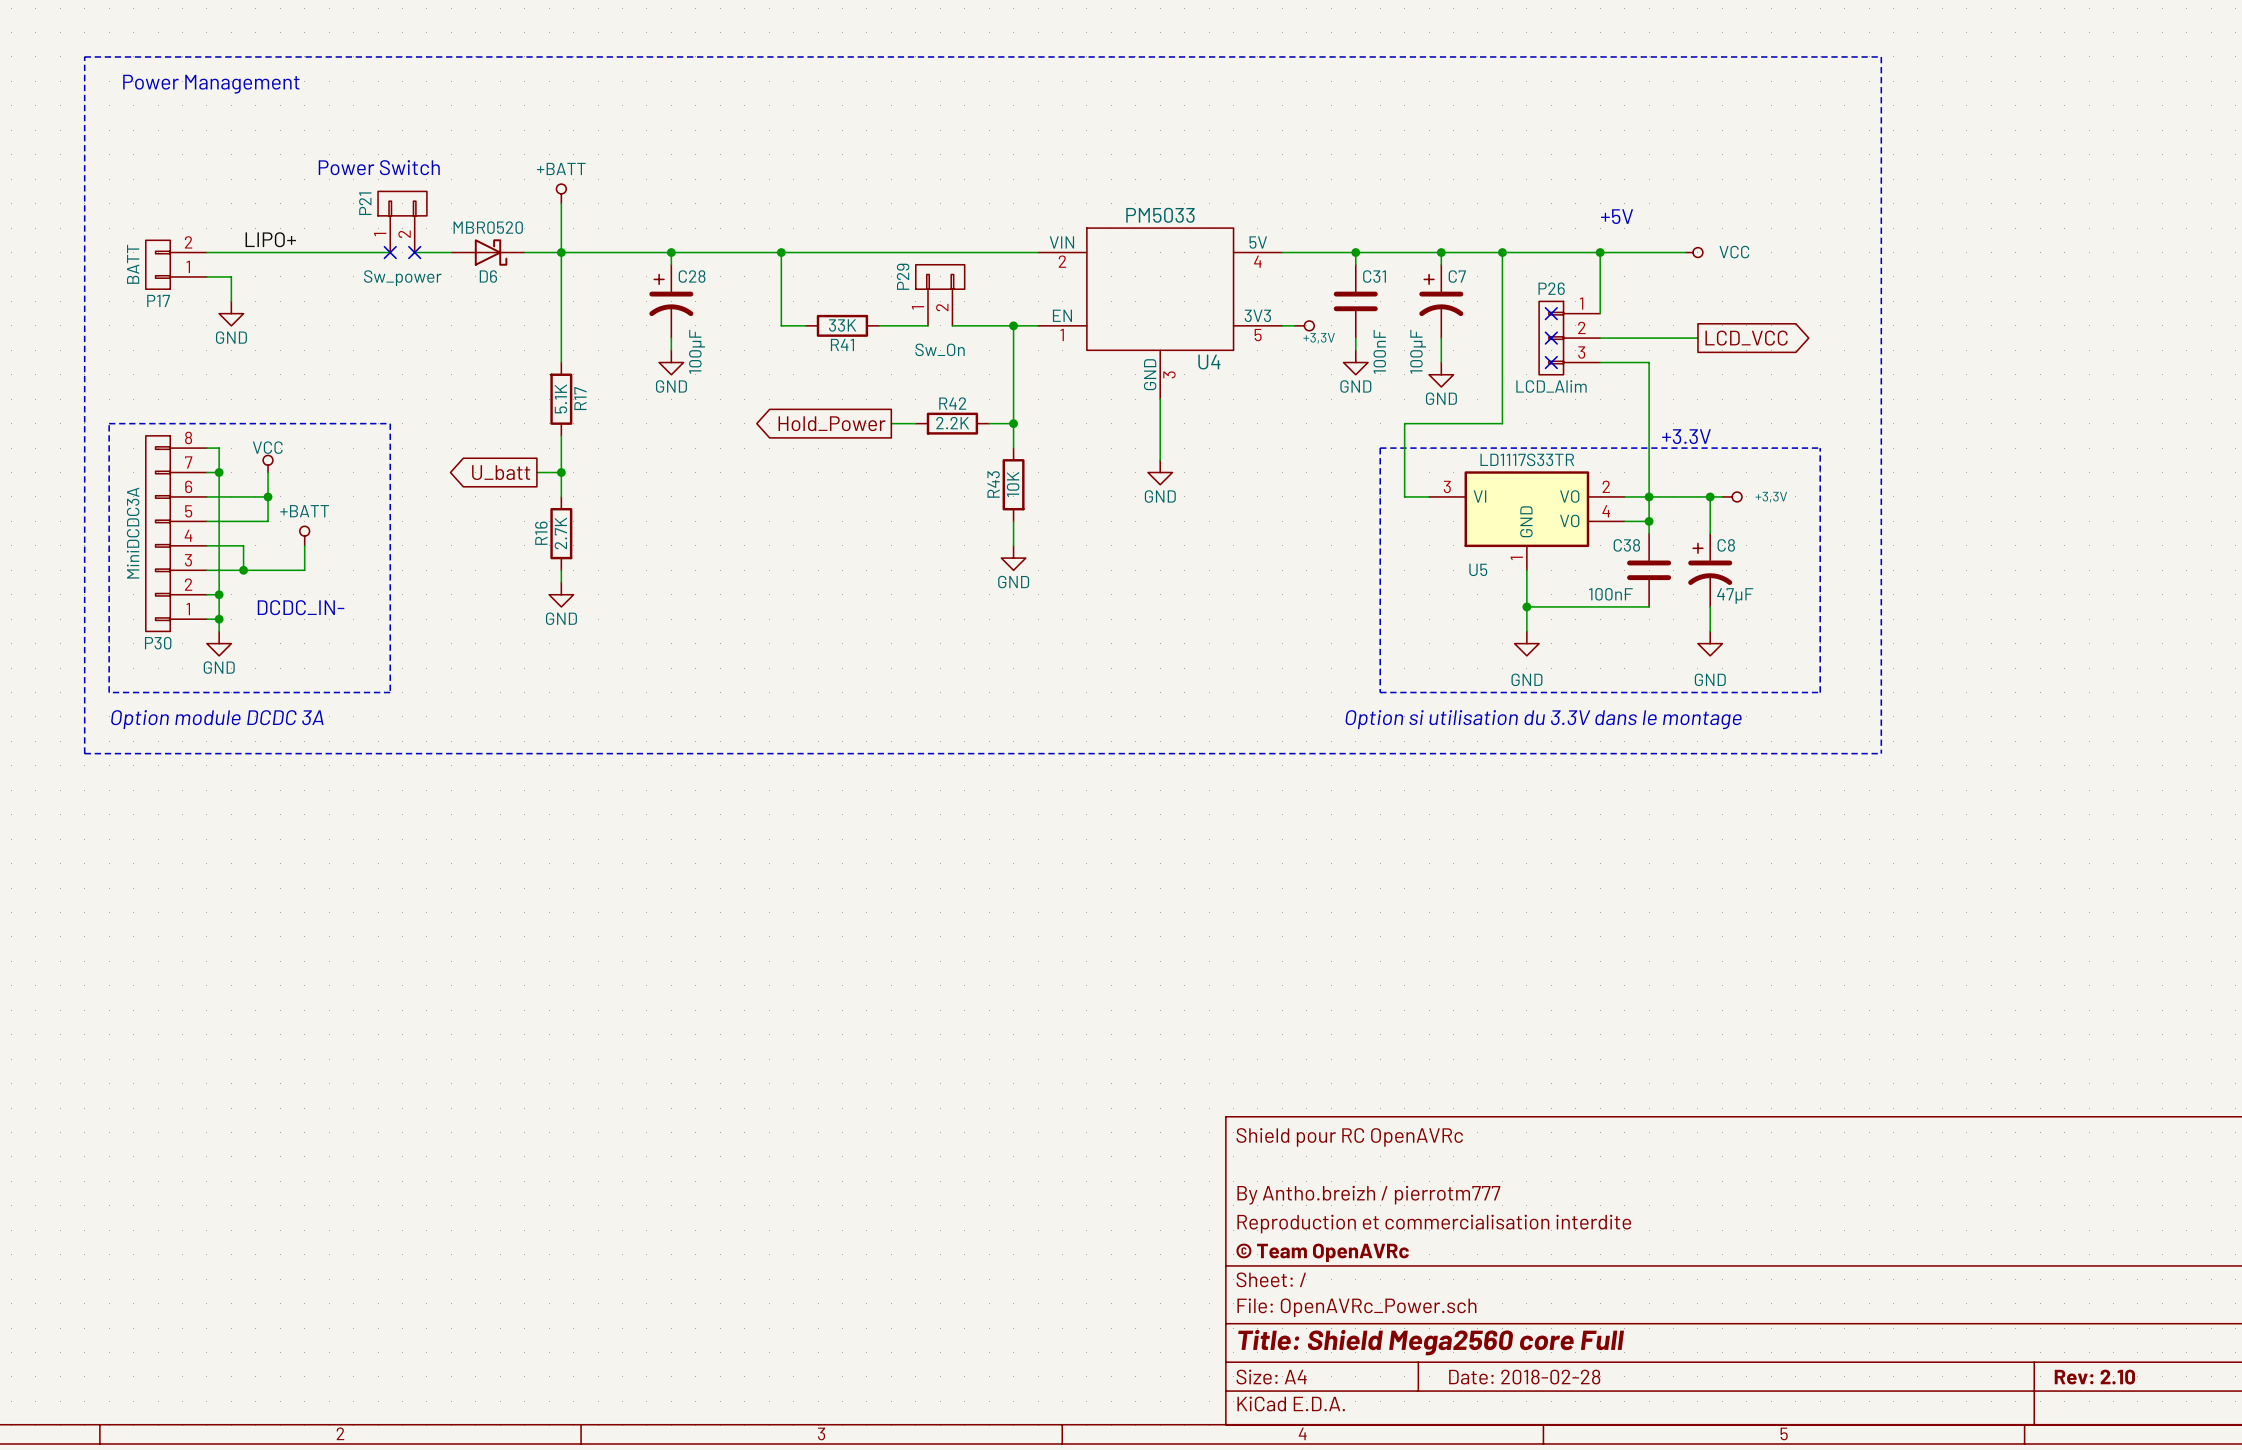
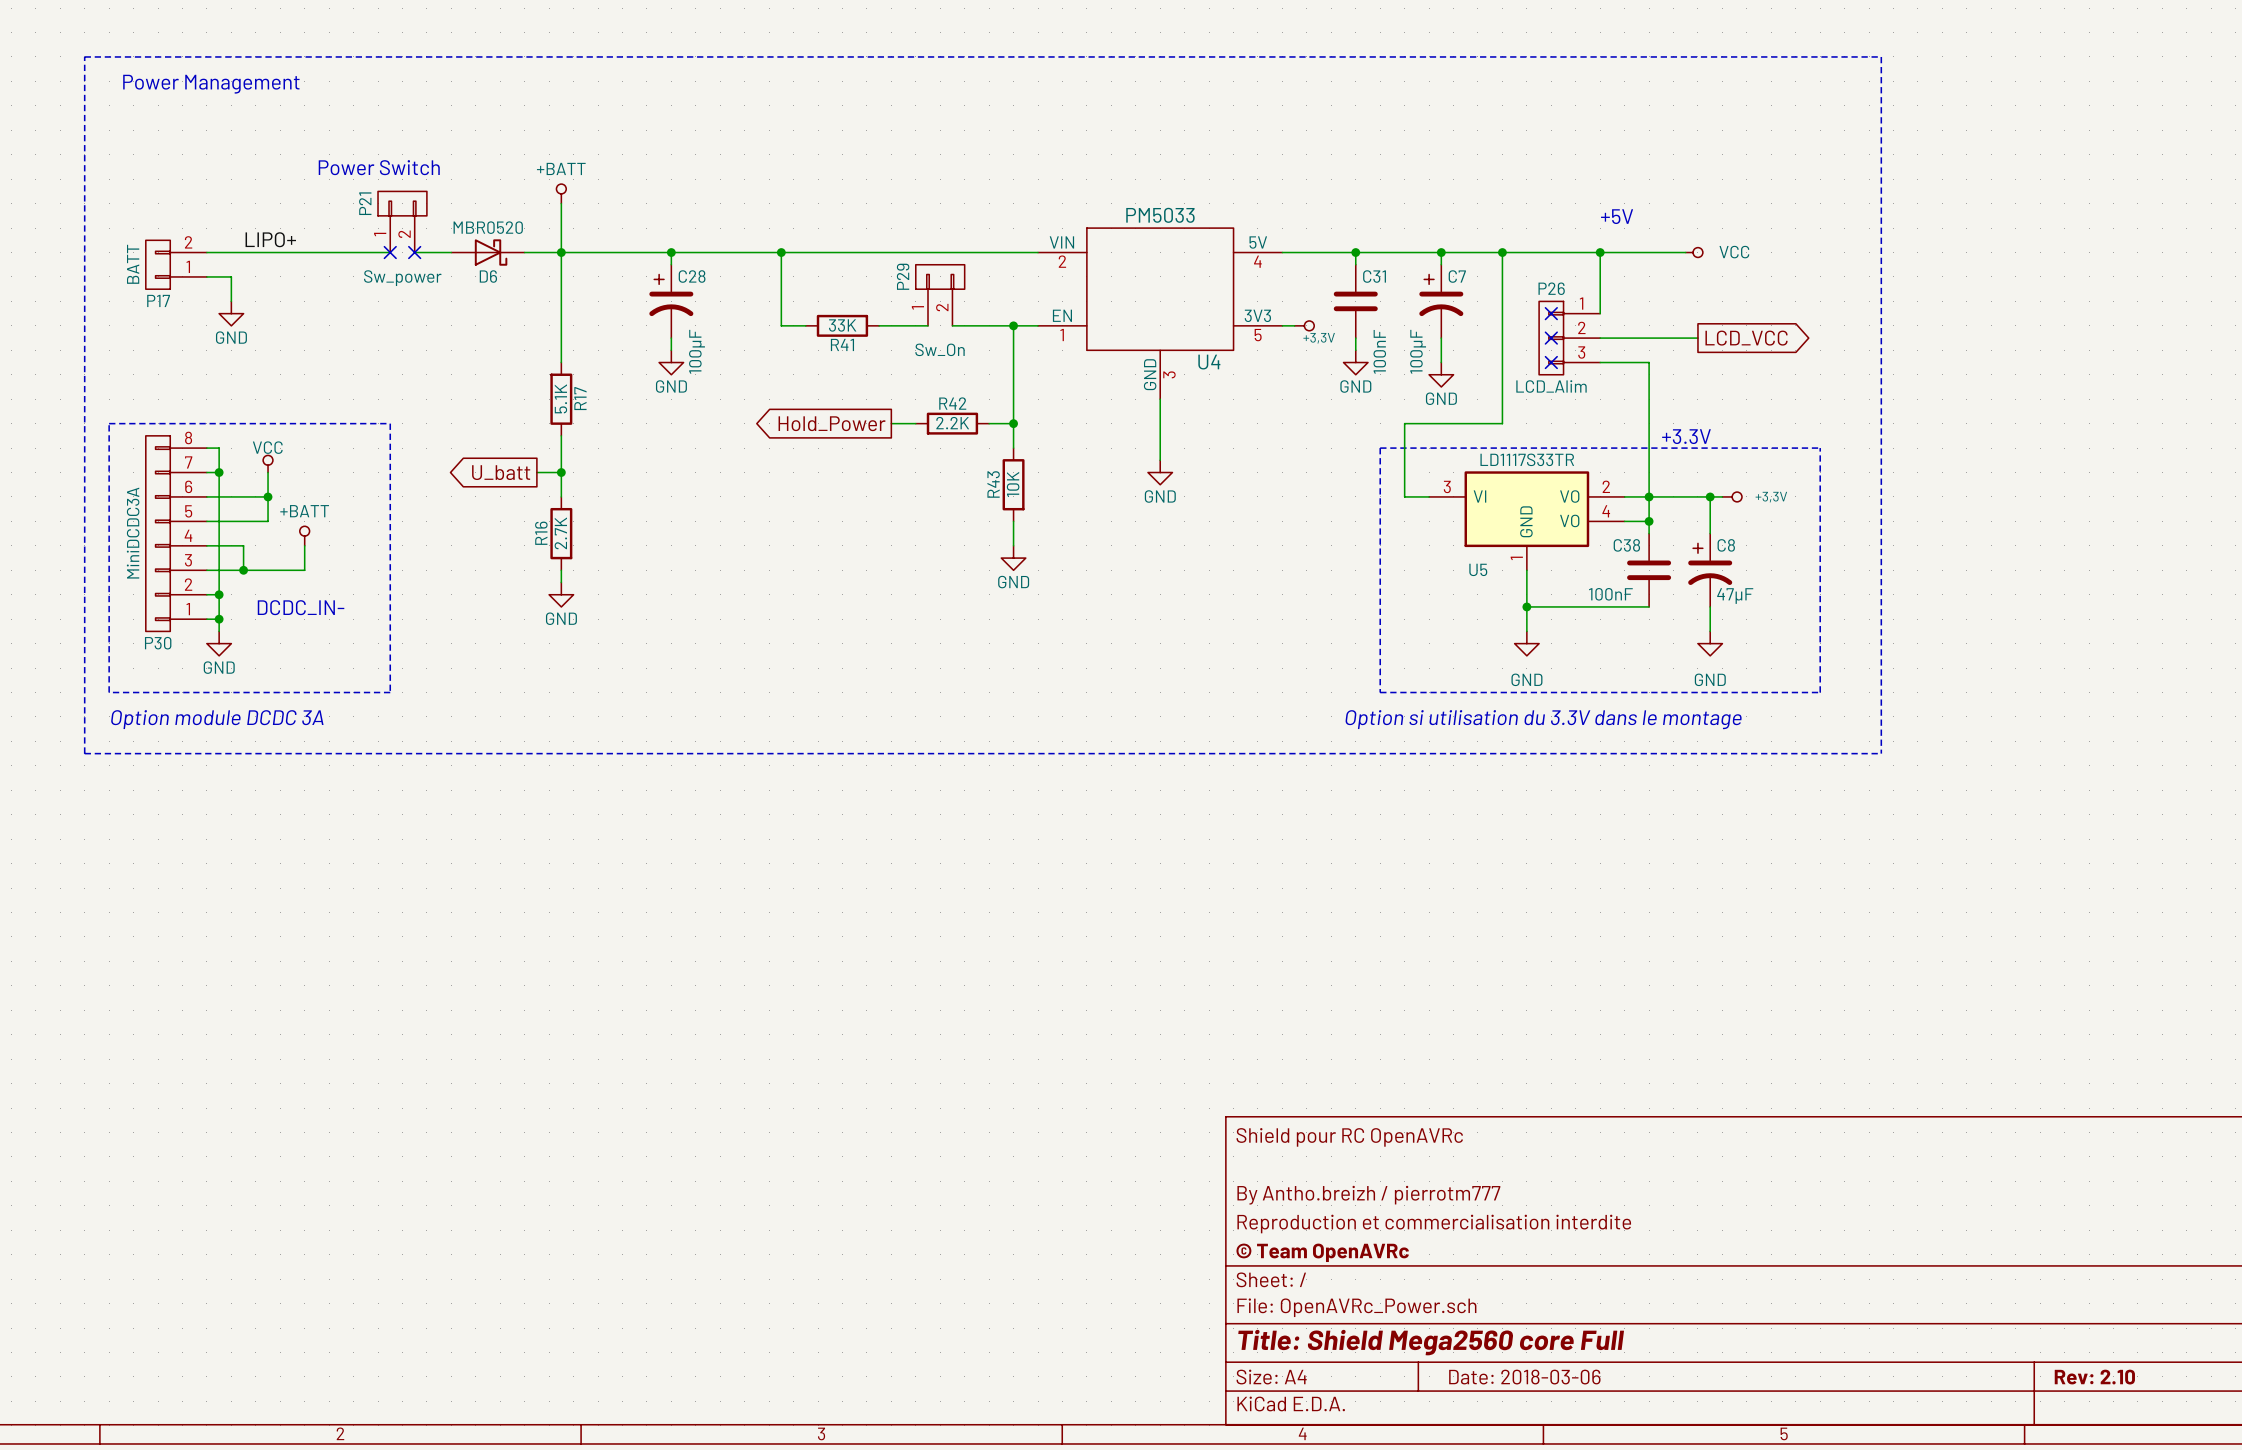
title block: Date: 2018-02-28 (1524, 1377) -> Date: 2018-03-06 (1524, 1377)

